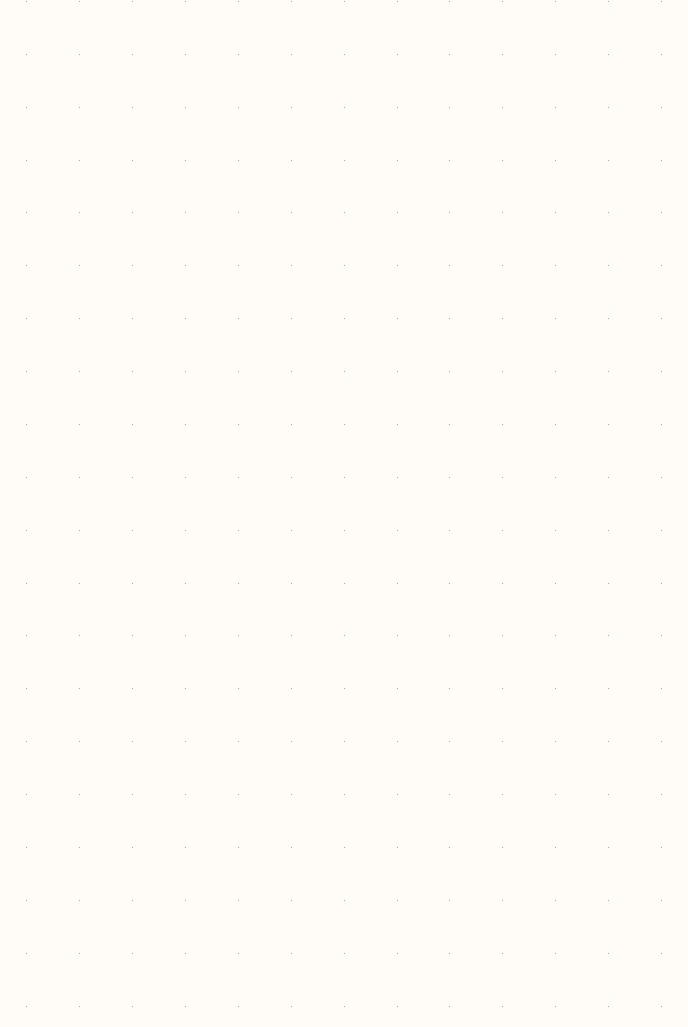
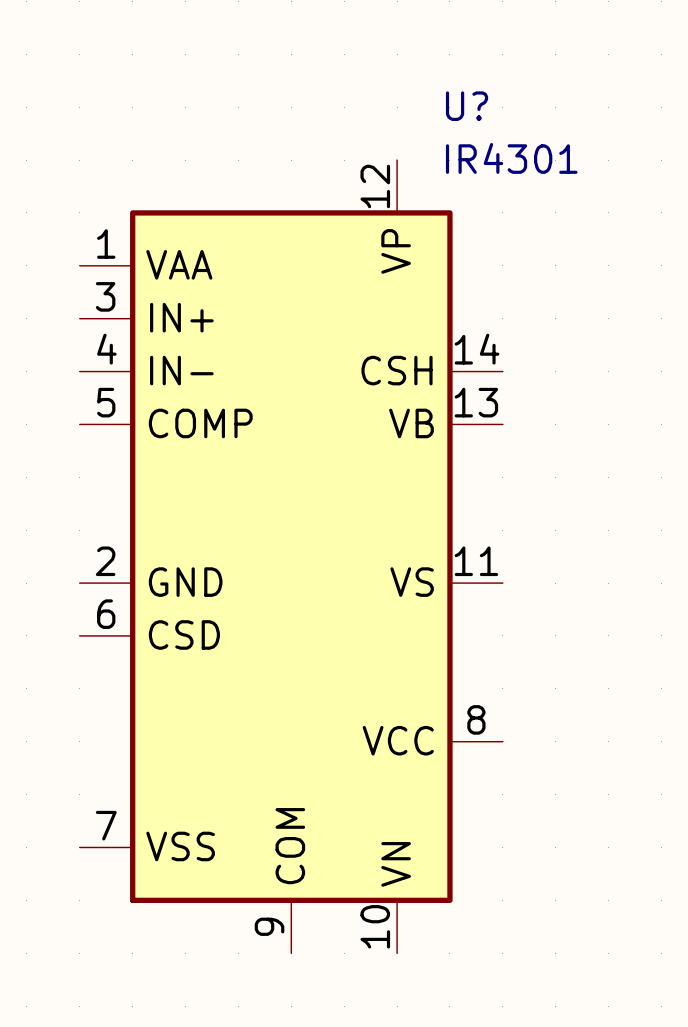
U?: none -> IR4301 (291, 556)

